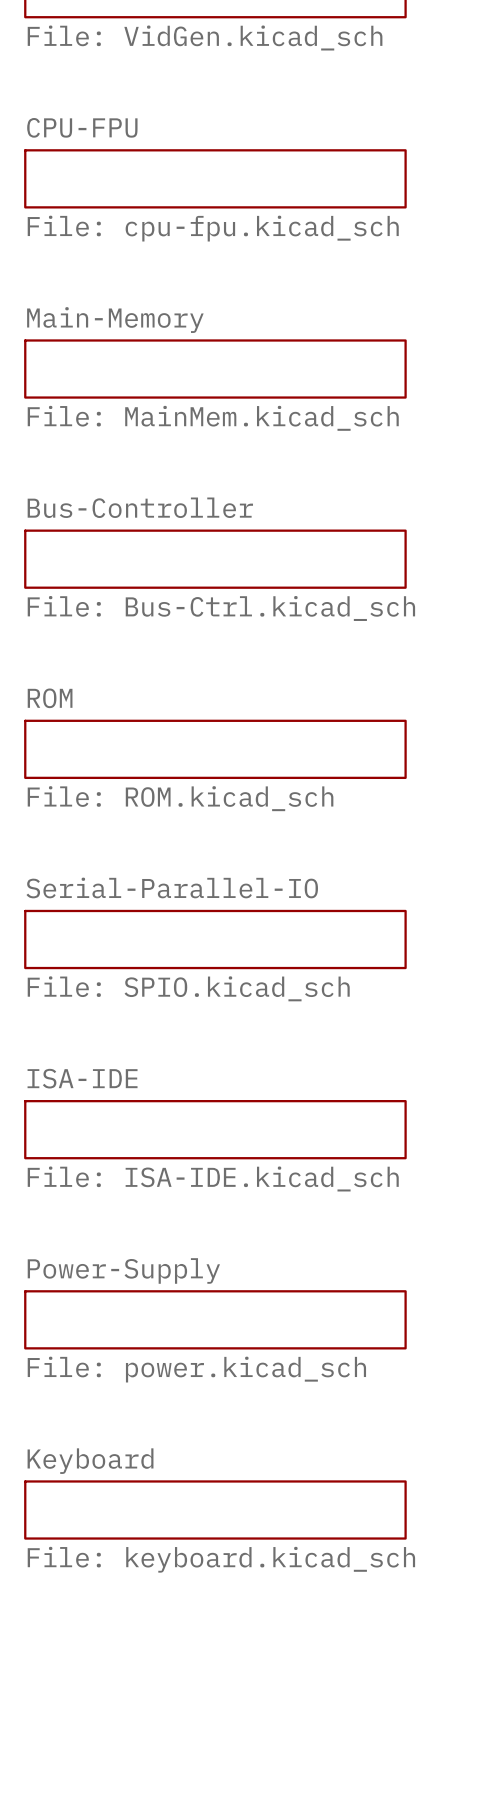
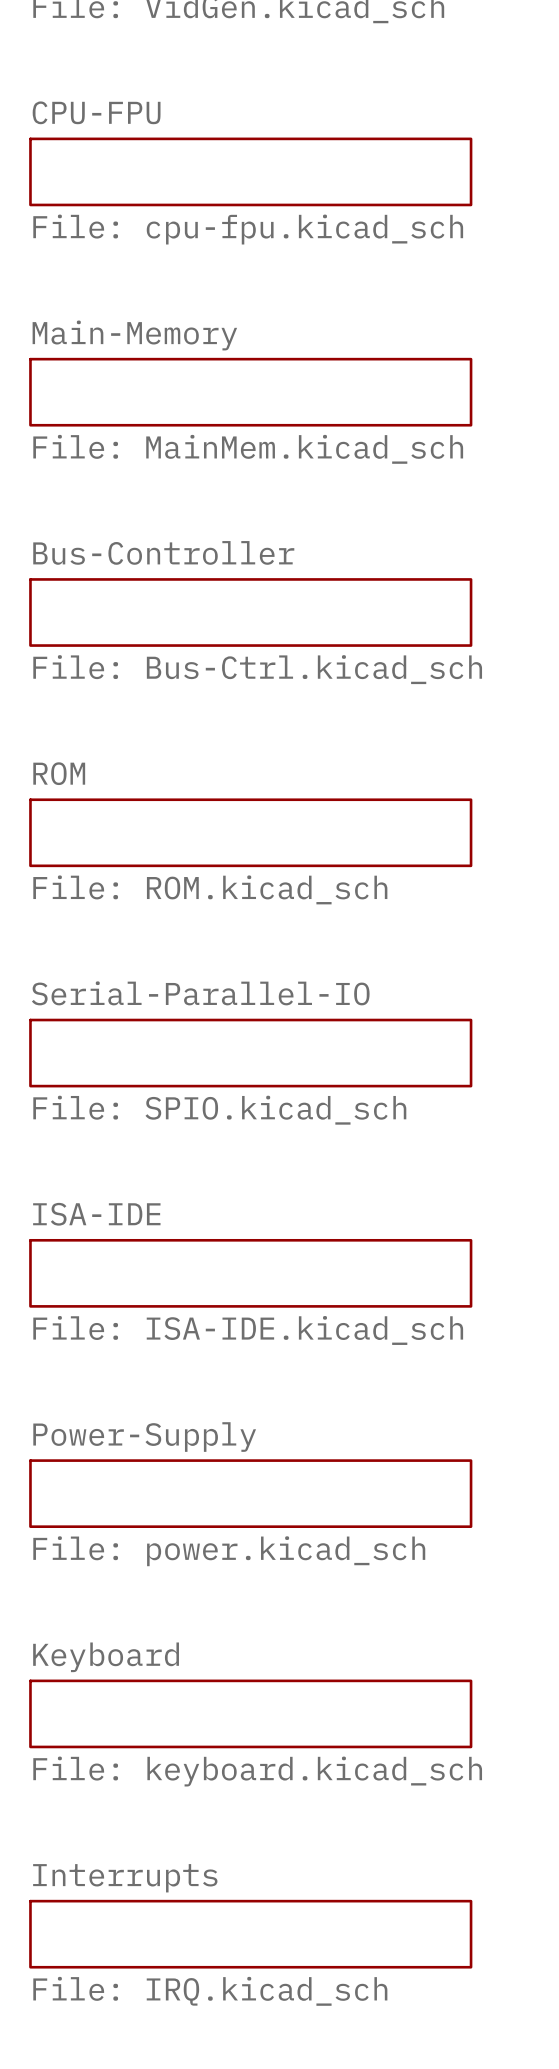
sheet Interrupts: none -> File: IRQ.kicad_sch (250, 1934)

